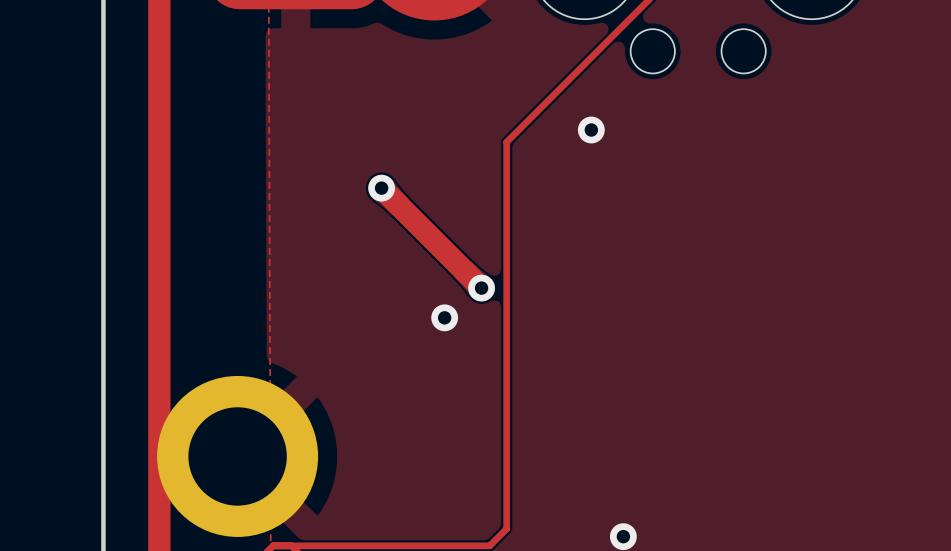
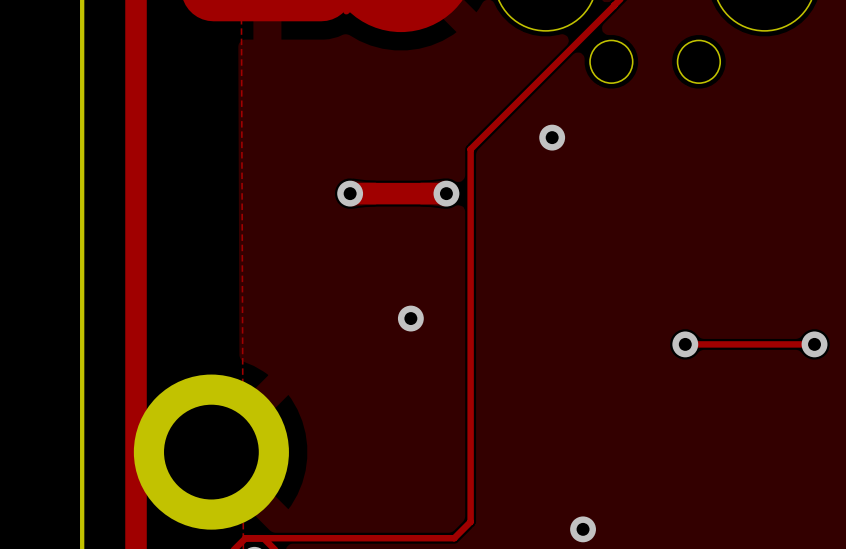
track: (381, 188) (481, 288) -> (350, 193) (446, 193)
via position: (481, 288) -> (446, 193)
track: none -> (685, 344) (814, 344)
via: none -> (685, 344)
via: none -> (814, 344)

